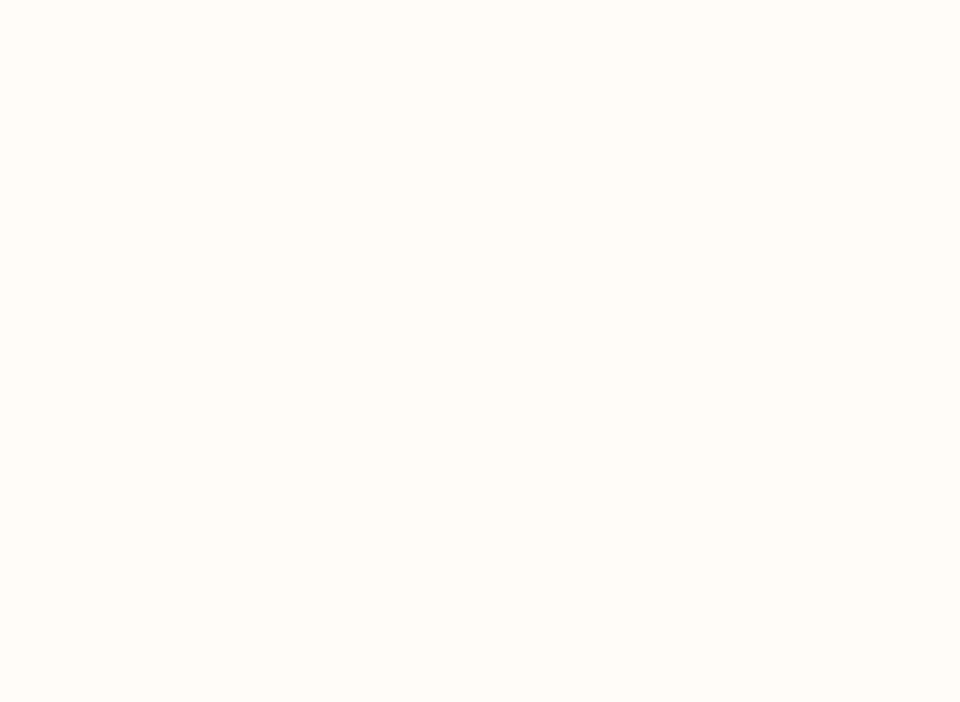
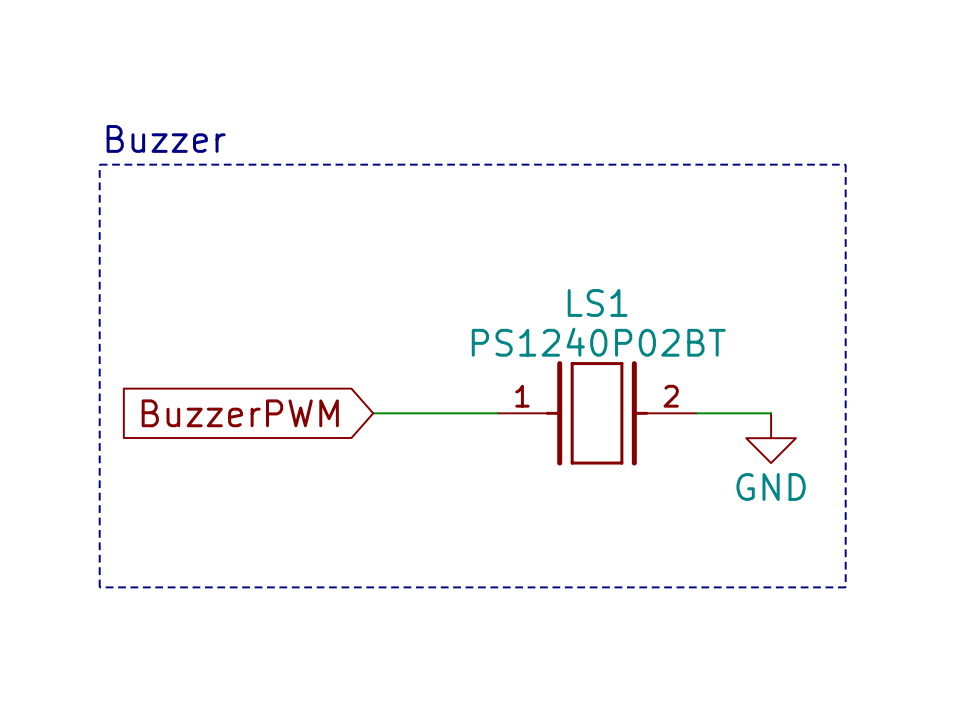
text: none -> Buzzer (166, 138)
line: none -> (99, 164) (845, 164) (845, 587) (99, 587) (99, 164)
global label: none -> BuzzerPWM (240, 413)
wire: none -> (373, 413) (497, 413)
LS1: none -> PS1240P02BT (597, 413)
wire: none -> (696, 413) (771, 413)
power symbol: none -> GND (771, 438)

